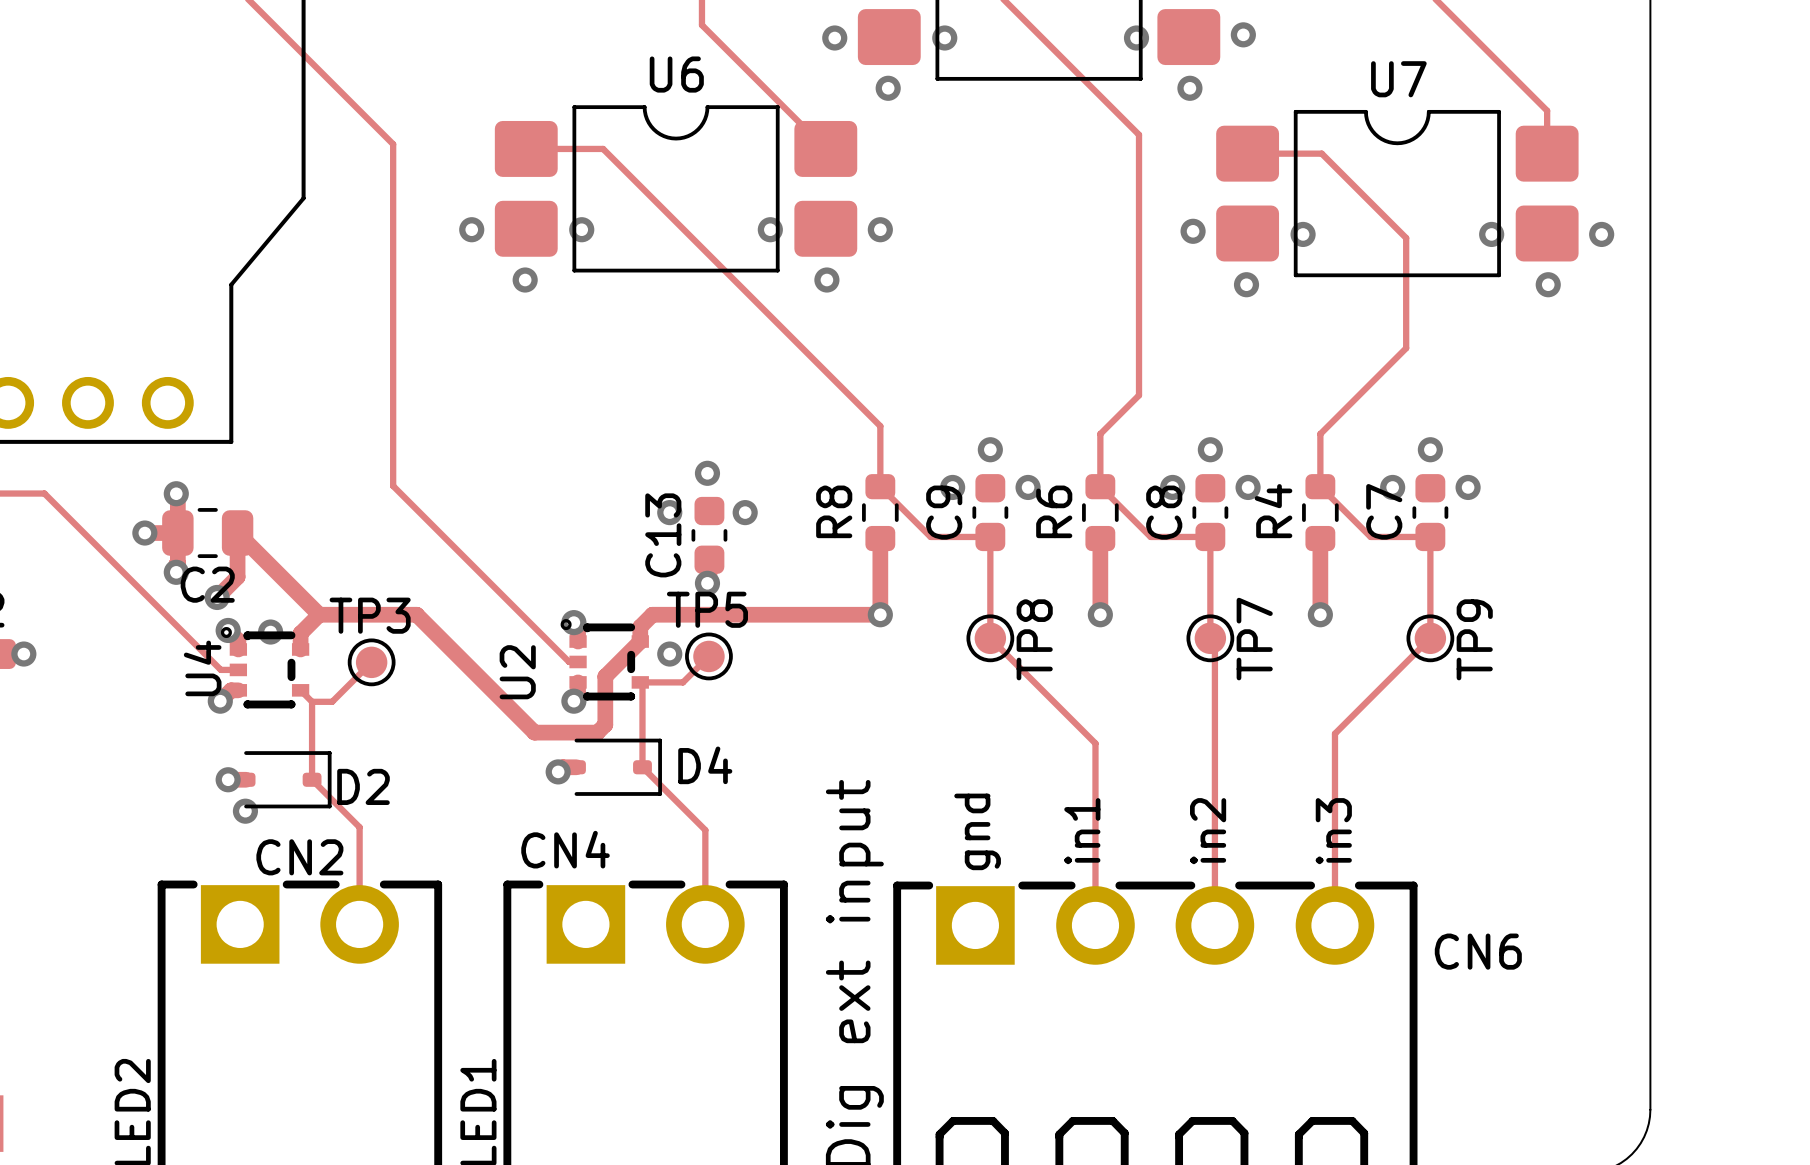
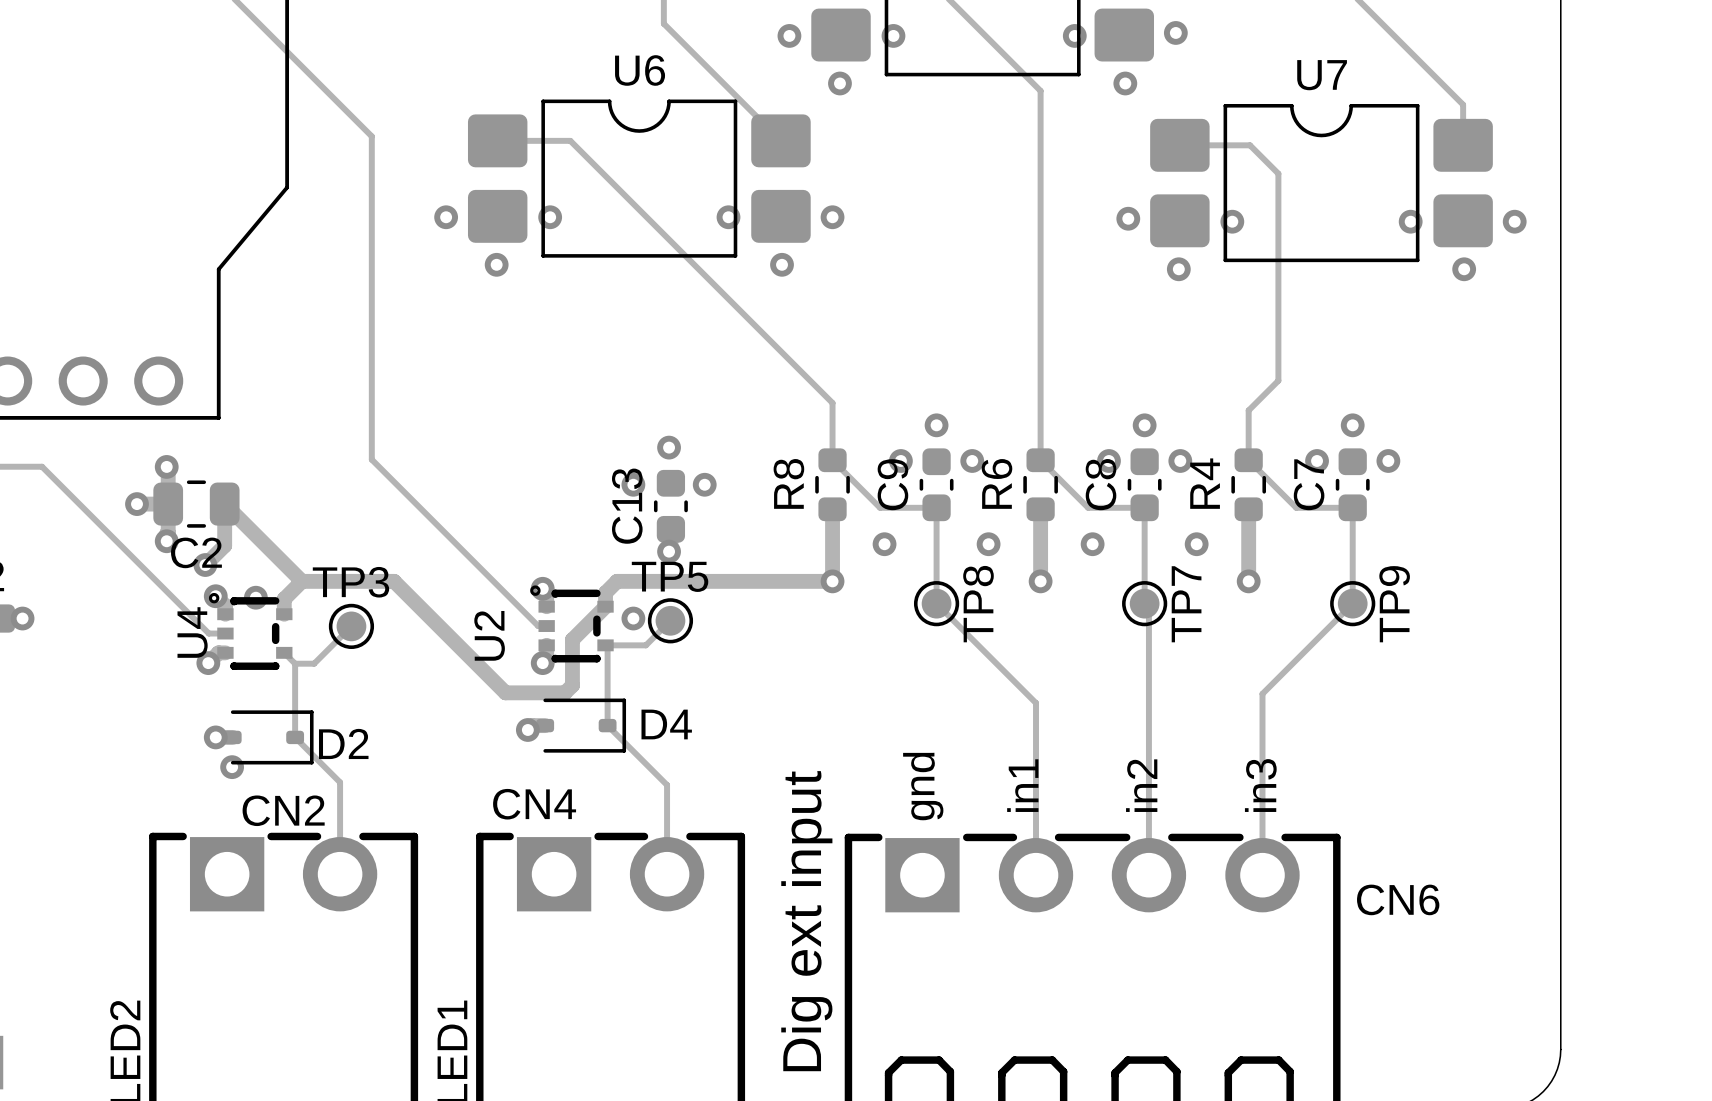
track: (1100, 96) (1139, 134) (1139, 395) (1100, 434) -> (1040, 90) (1040, 410)
track: (1351, 183) (1406, 238) (1406, 348) (1351, 402) -> (1278, 173) (1278, 380)
via: none -> (884, 544)
via: none -> (988, 544)
via: none -> (1092, 544)
via: none -> (1196, 544)

